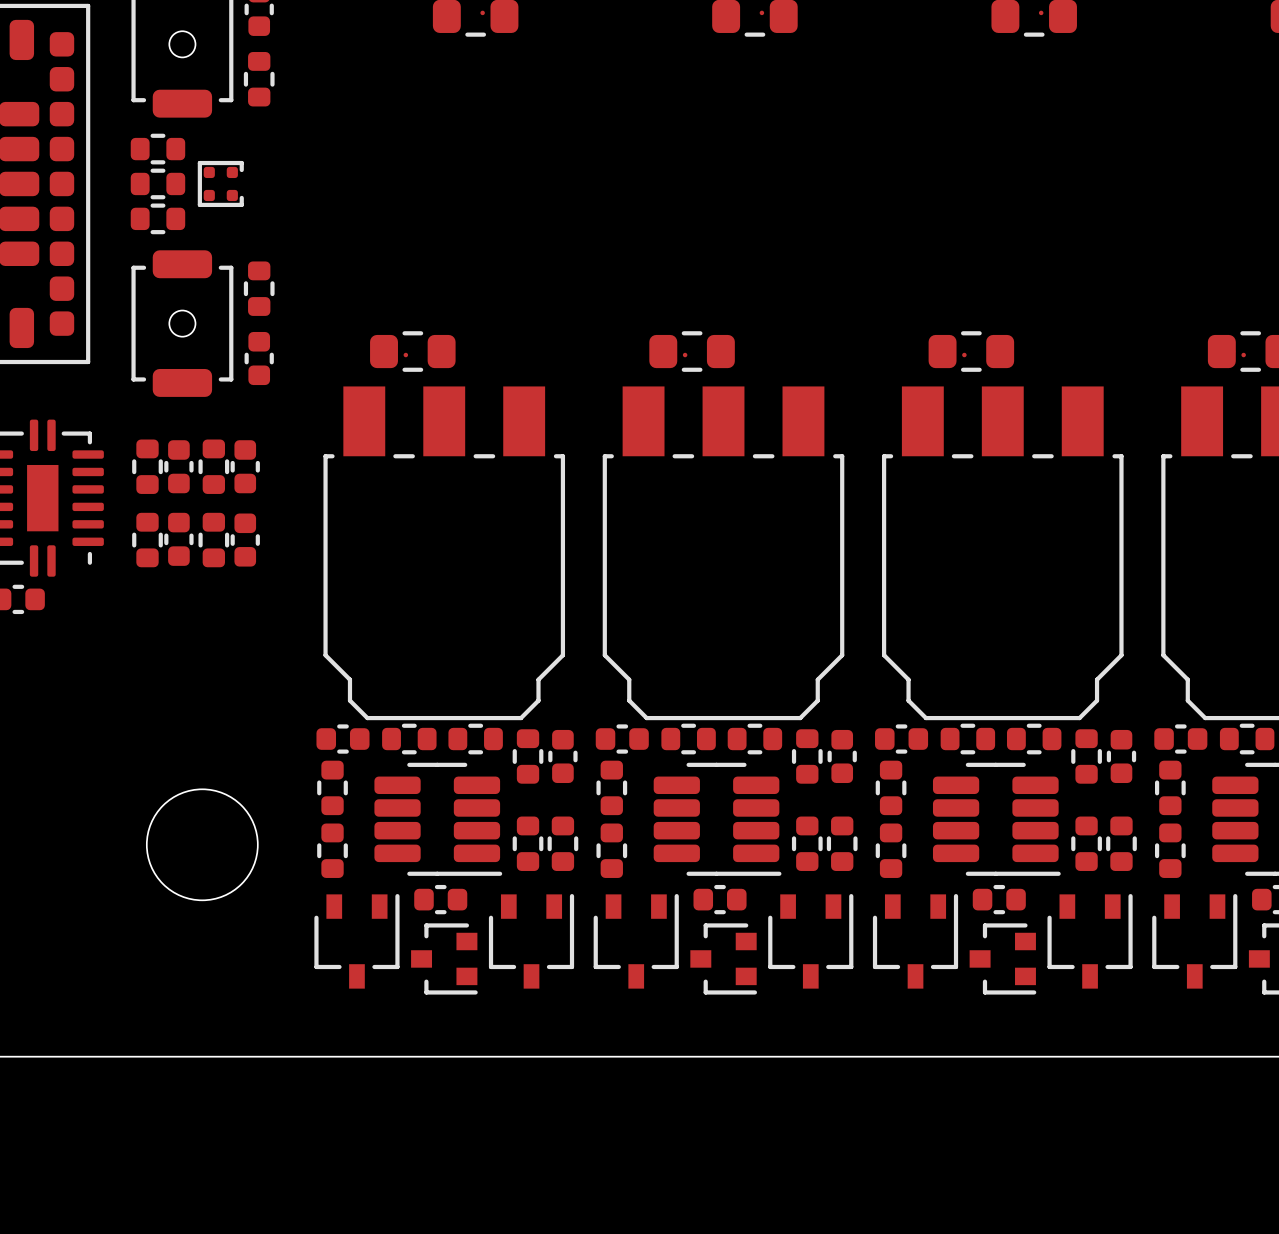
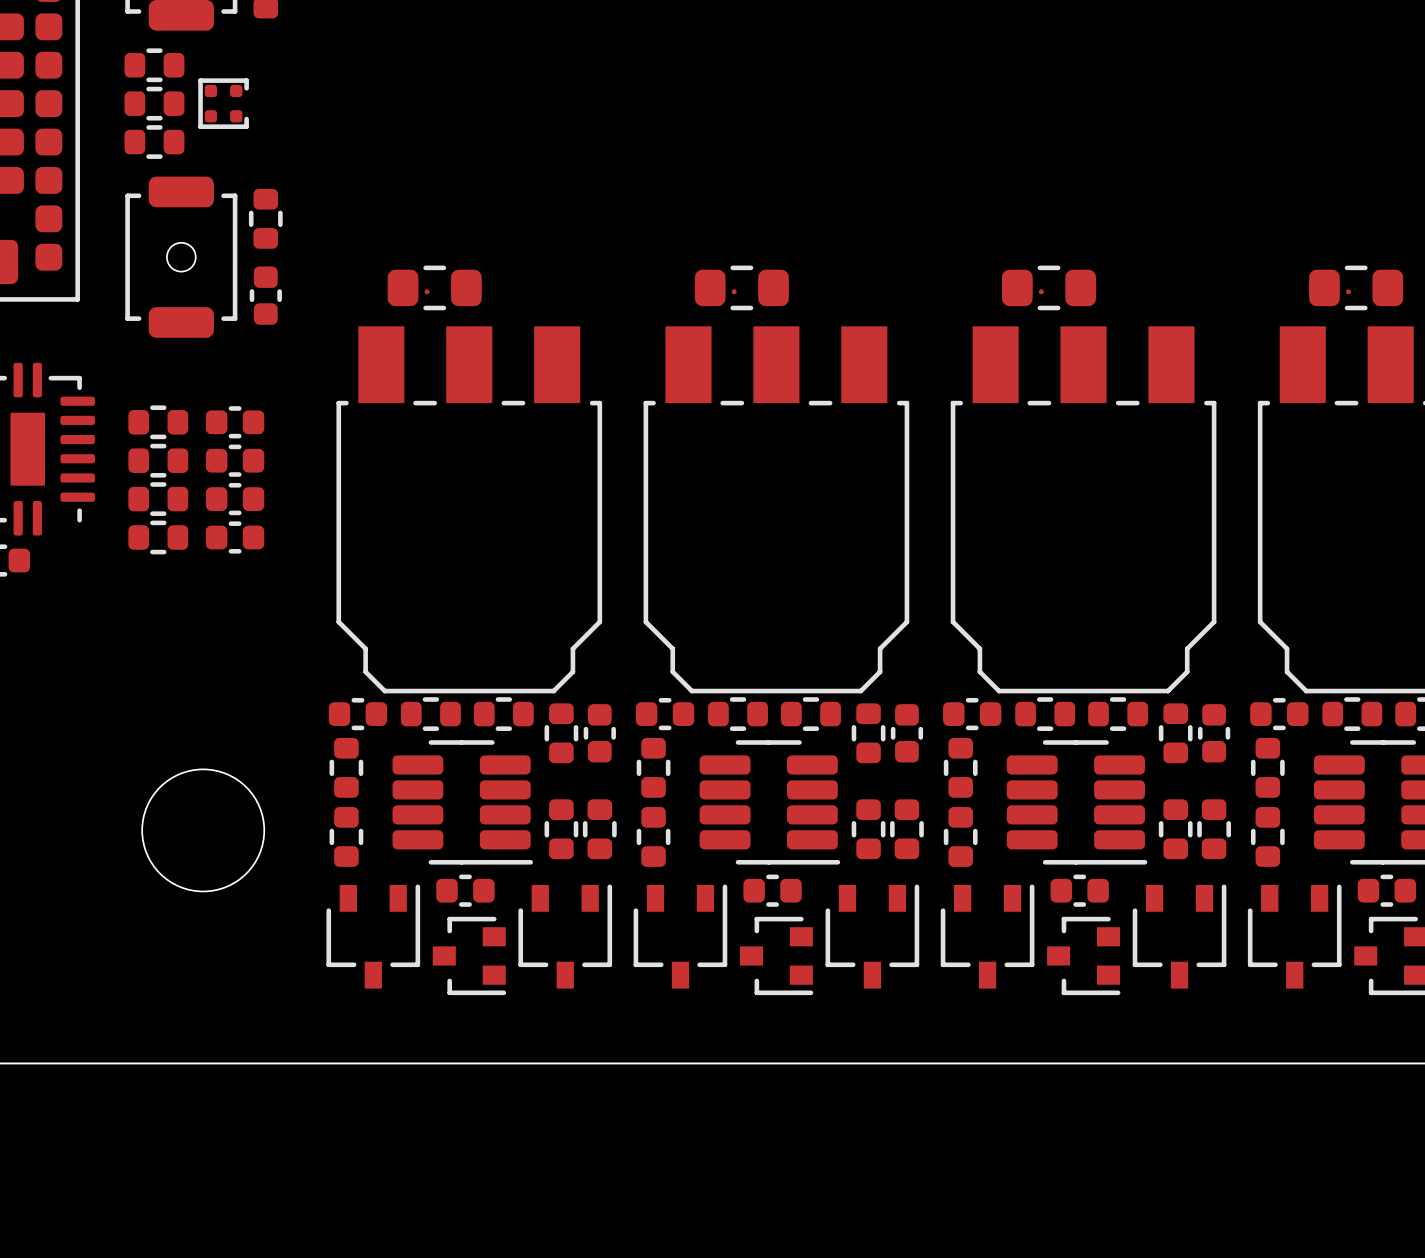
part rotation: 0° (147, 466) -> 90° clockwise (158, 422)
part: (178, 466) -> none
part: (213, 466) -> none
part rotation: 0° (245, 466) -> 90° clockwise (235, 422)
part: none -> (158, 460)
part: none -> (235, 460)
part: (178, 539) -> none
part rotation: 0° (147, 540) -> 90° clockwise (158, 499)
part: (213, 540) -> none
part rotation: 0° (245, 540) -> 90° clockwise (235, 499)
part: none -> (158, 537)
part: none -> (235, 537)

